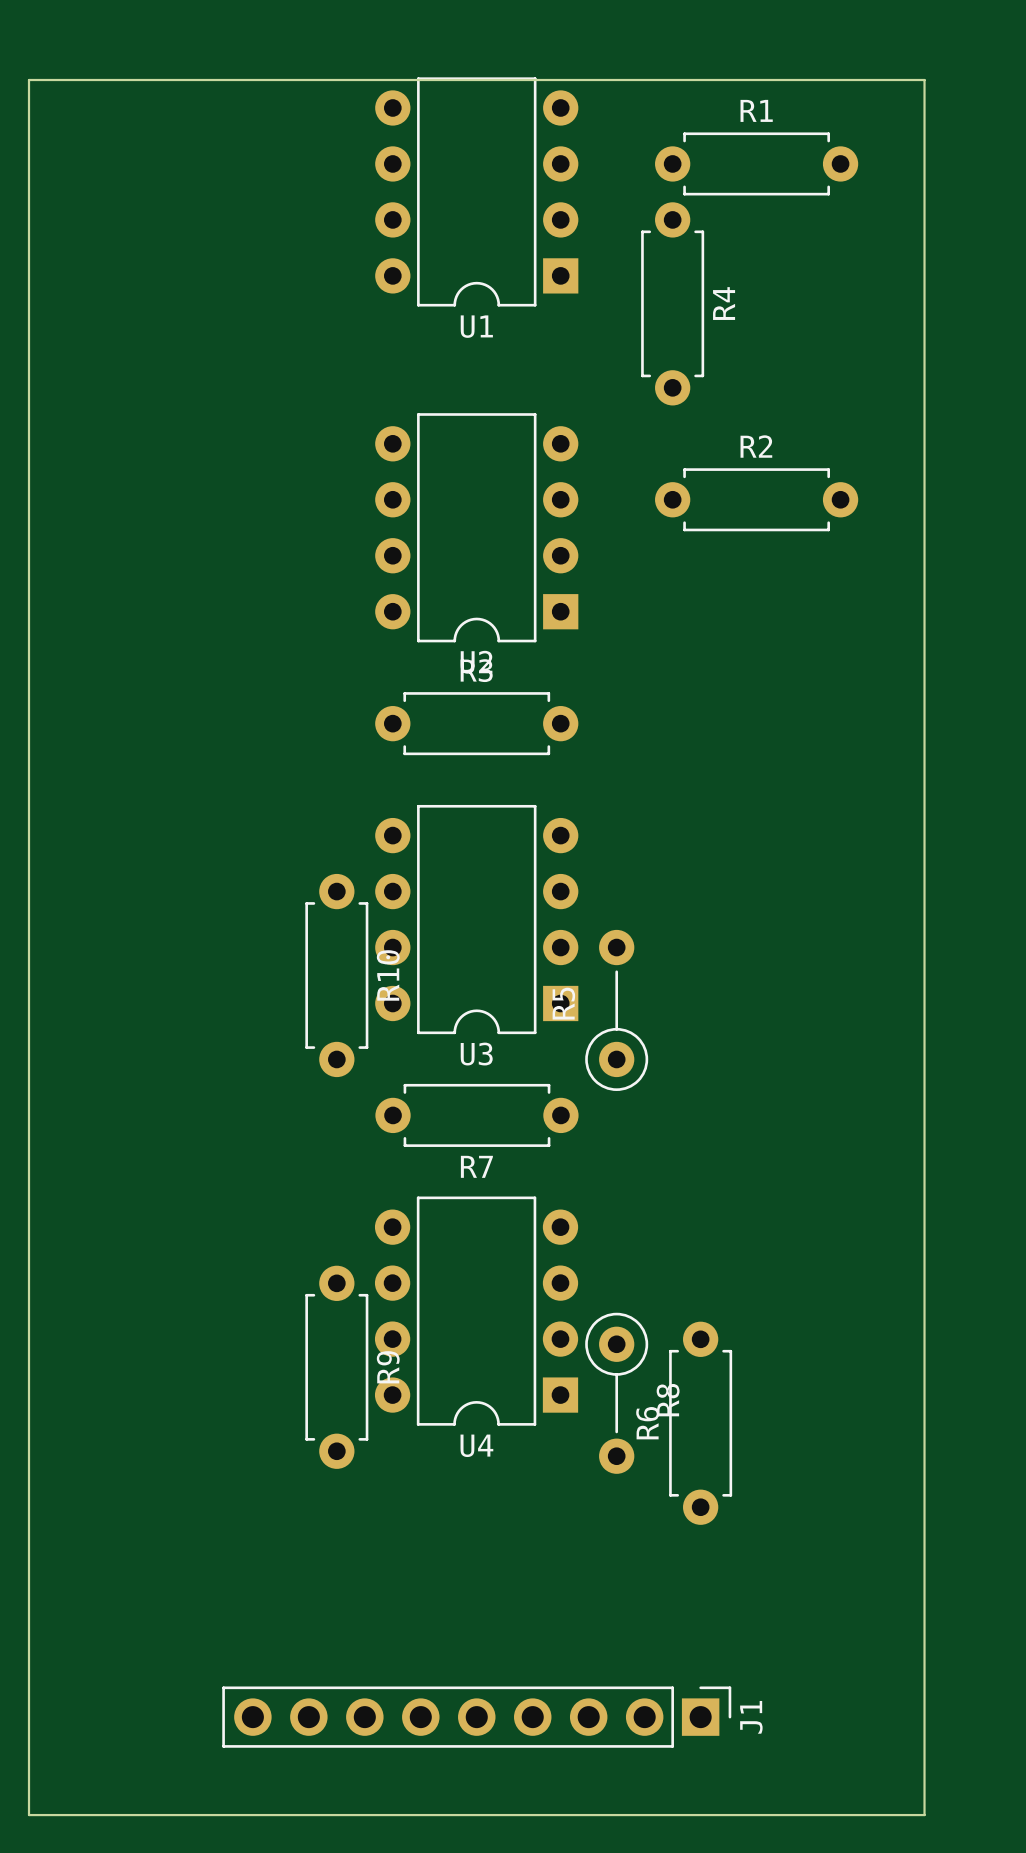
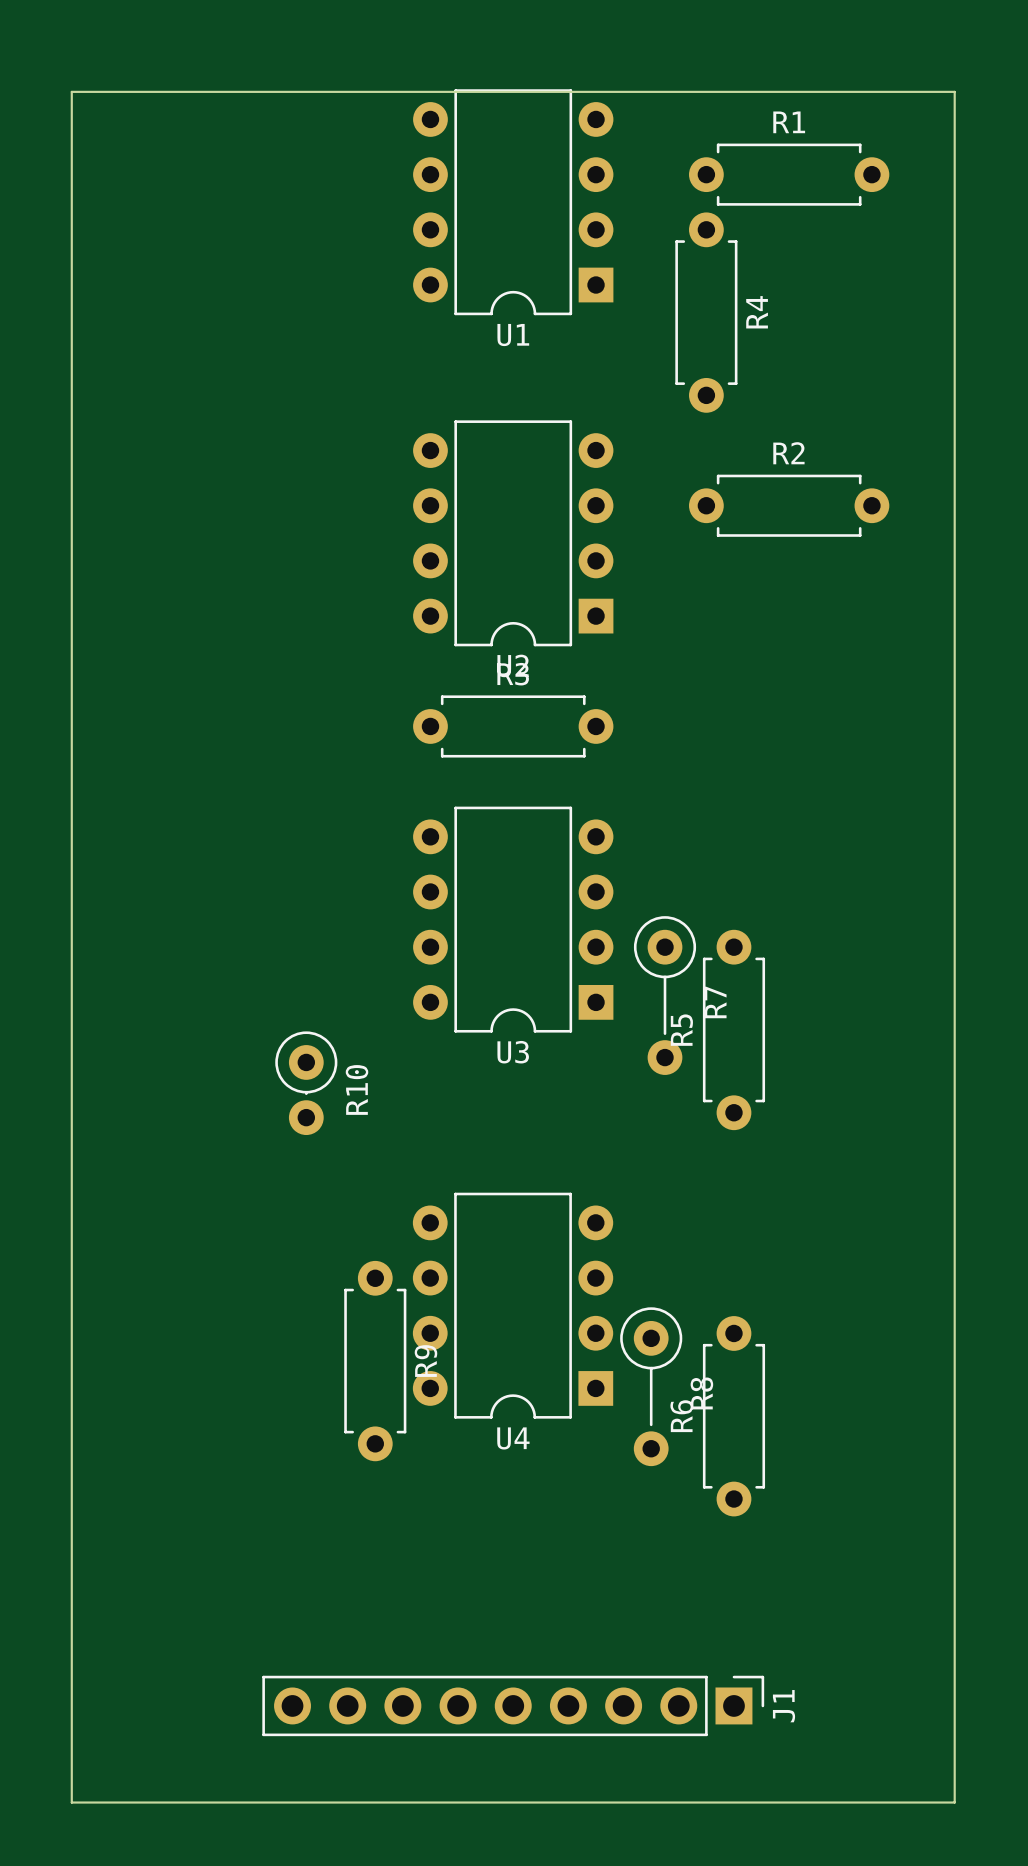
R10 footprint: [305, 873, 369, 1078] -> [275, 1031, 338, 1136]
R5 footprint: [585, 929, 649, 1091] -> [702, 929, 766, 1131]
R7 footprint: [375, 1083, 579, 1147] -> [633, 916, 697, 1075]
R7 name position: R7 (476, 1166) -> R7 (715, 1002)

